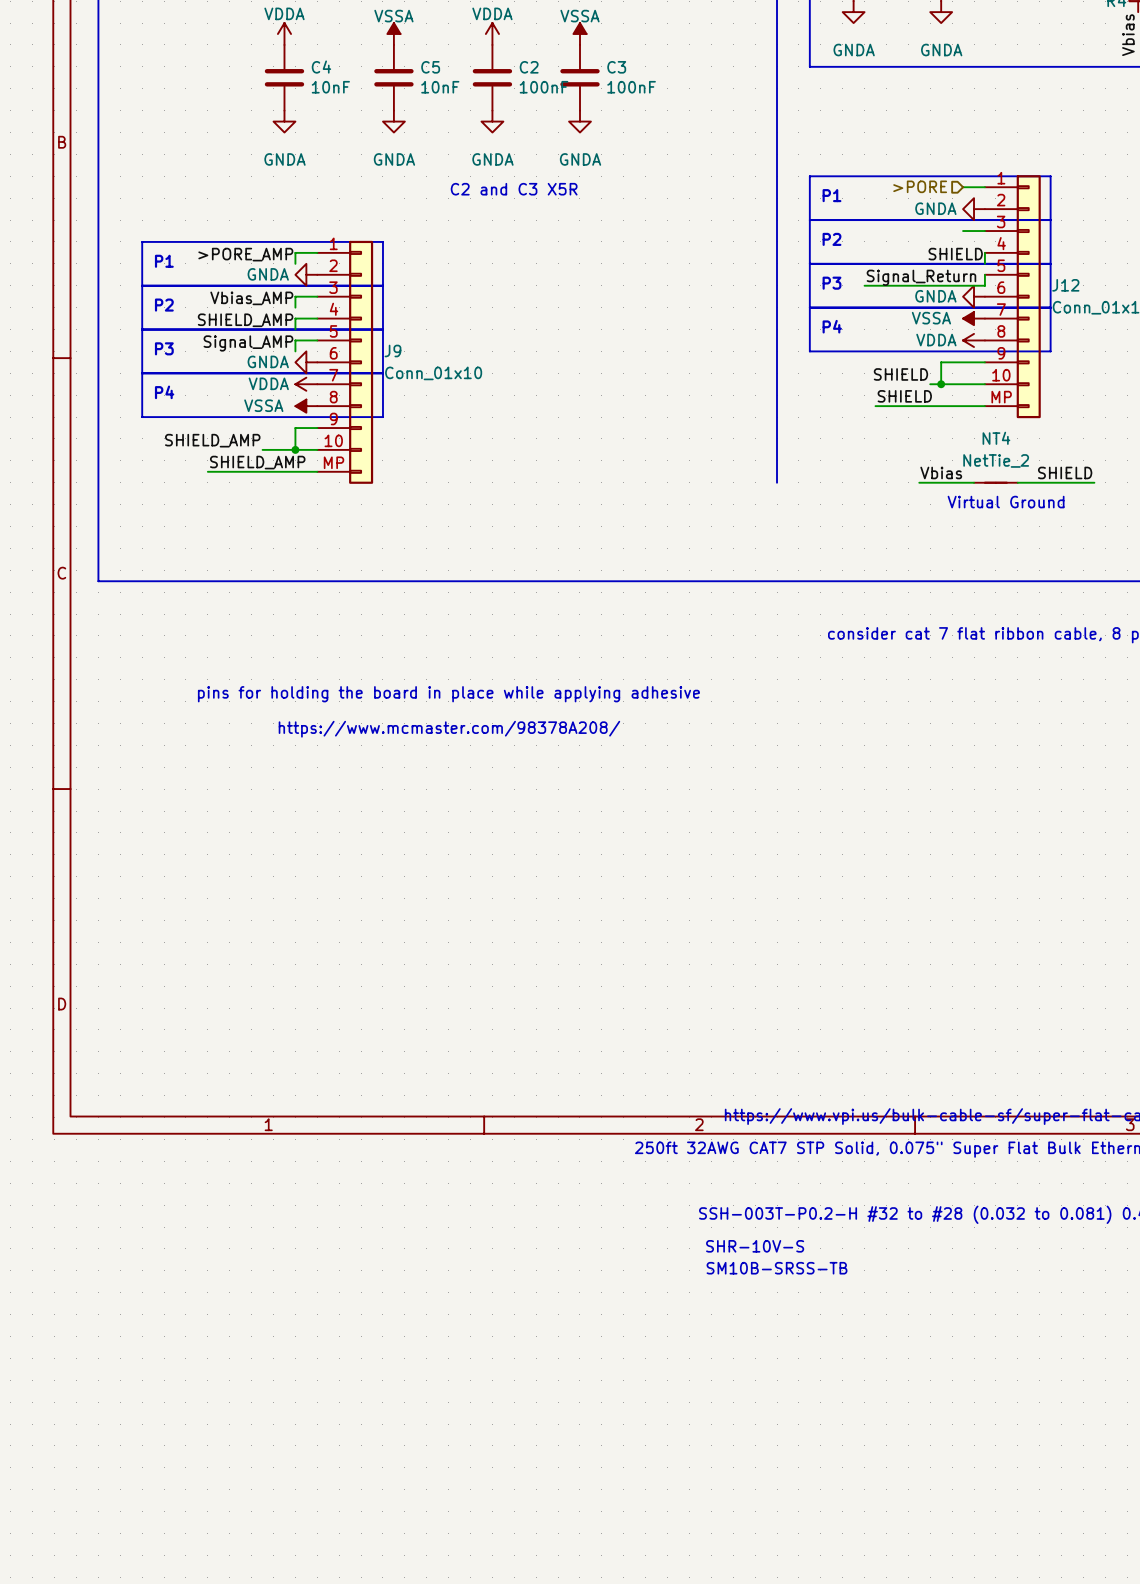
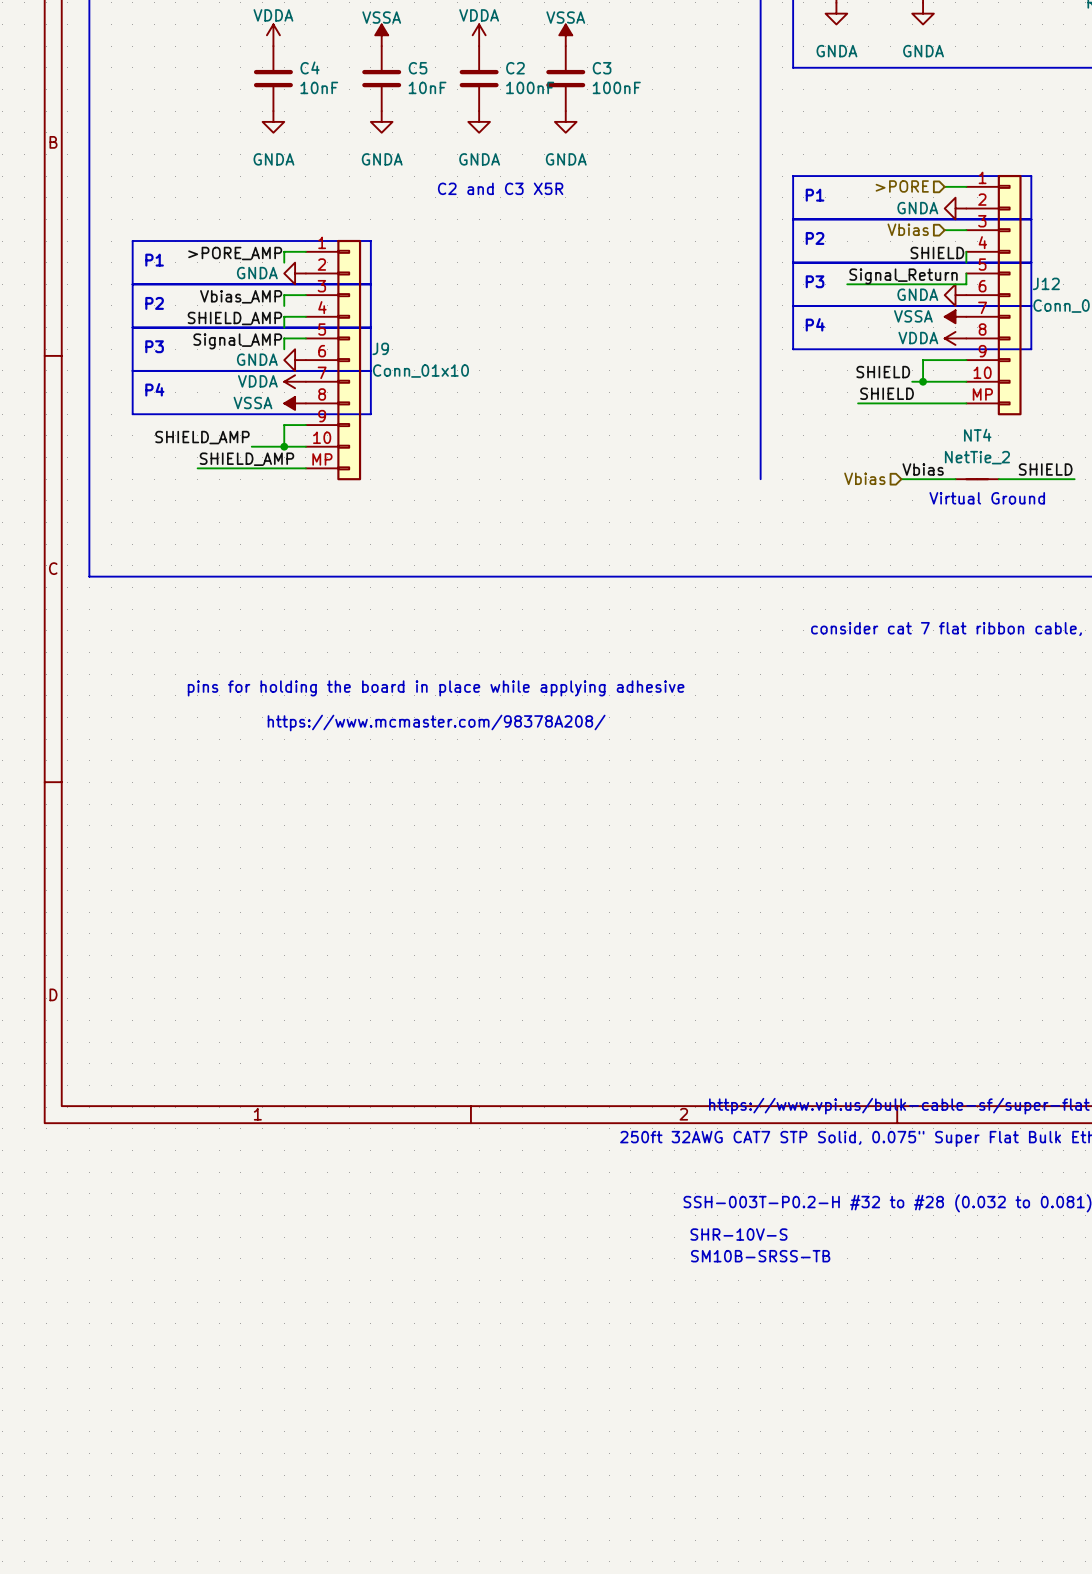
hierarchical label: none -> Vbias (908, 229)
hierarchical label: none -> Vbias (864, 478)

